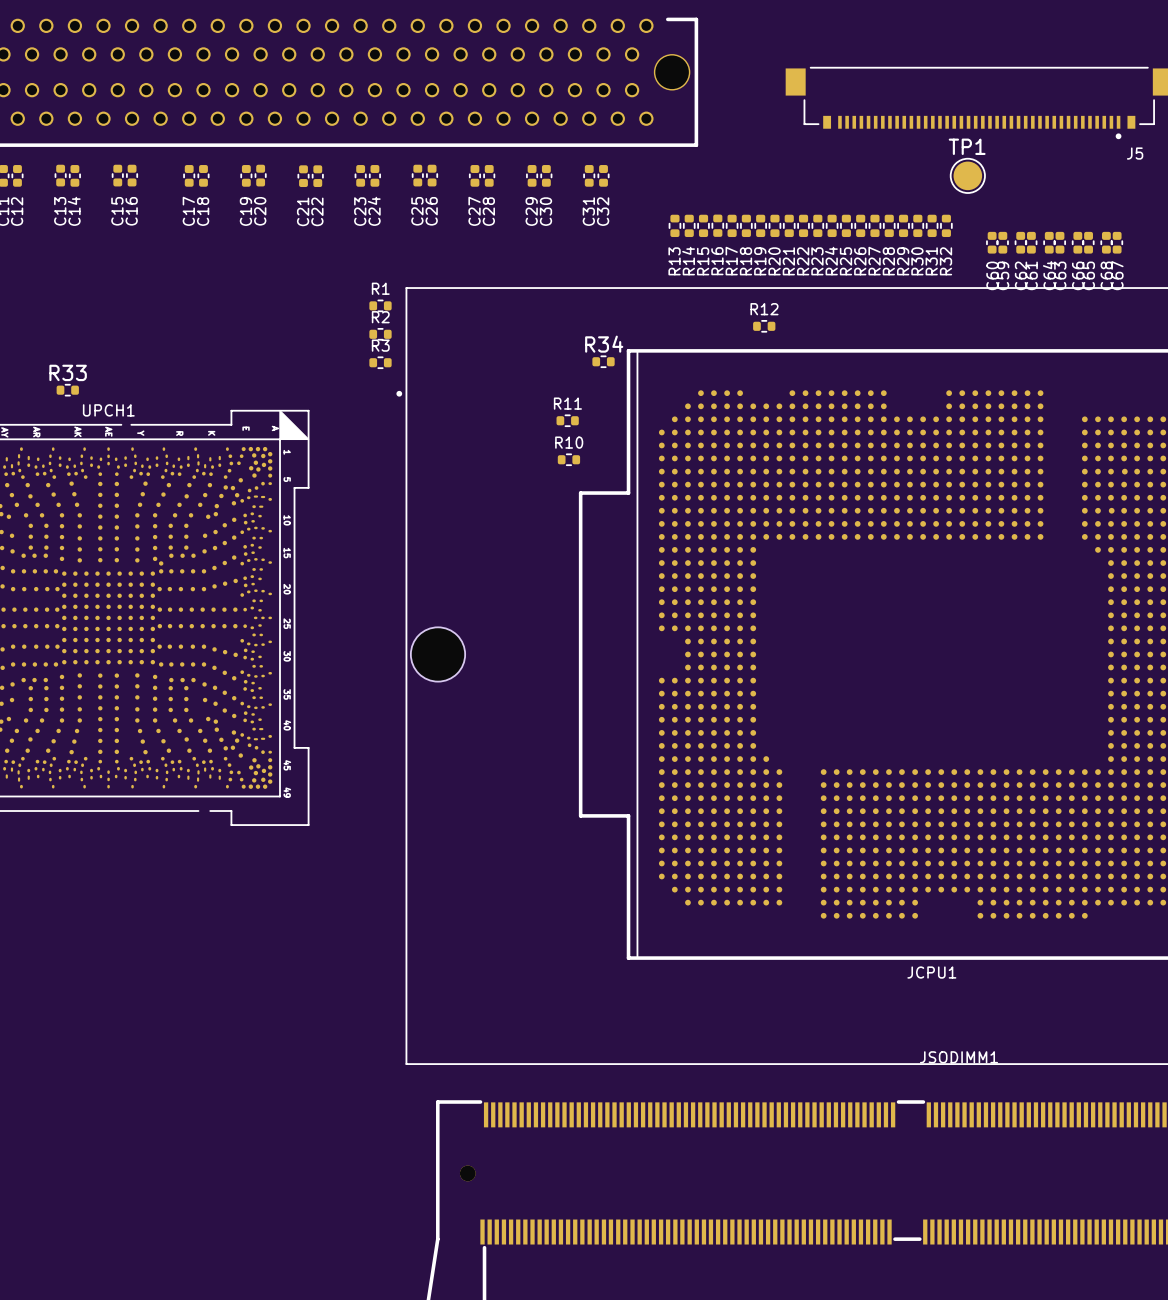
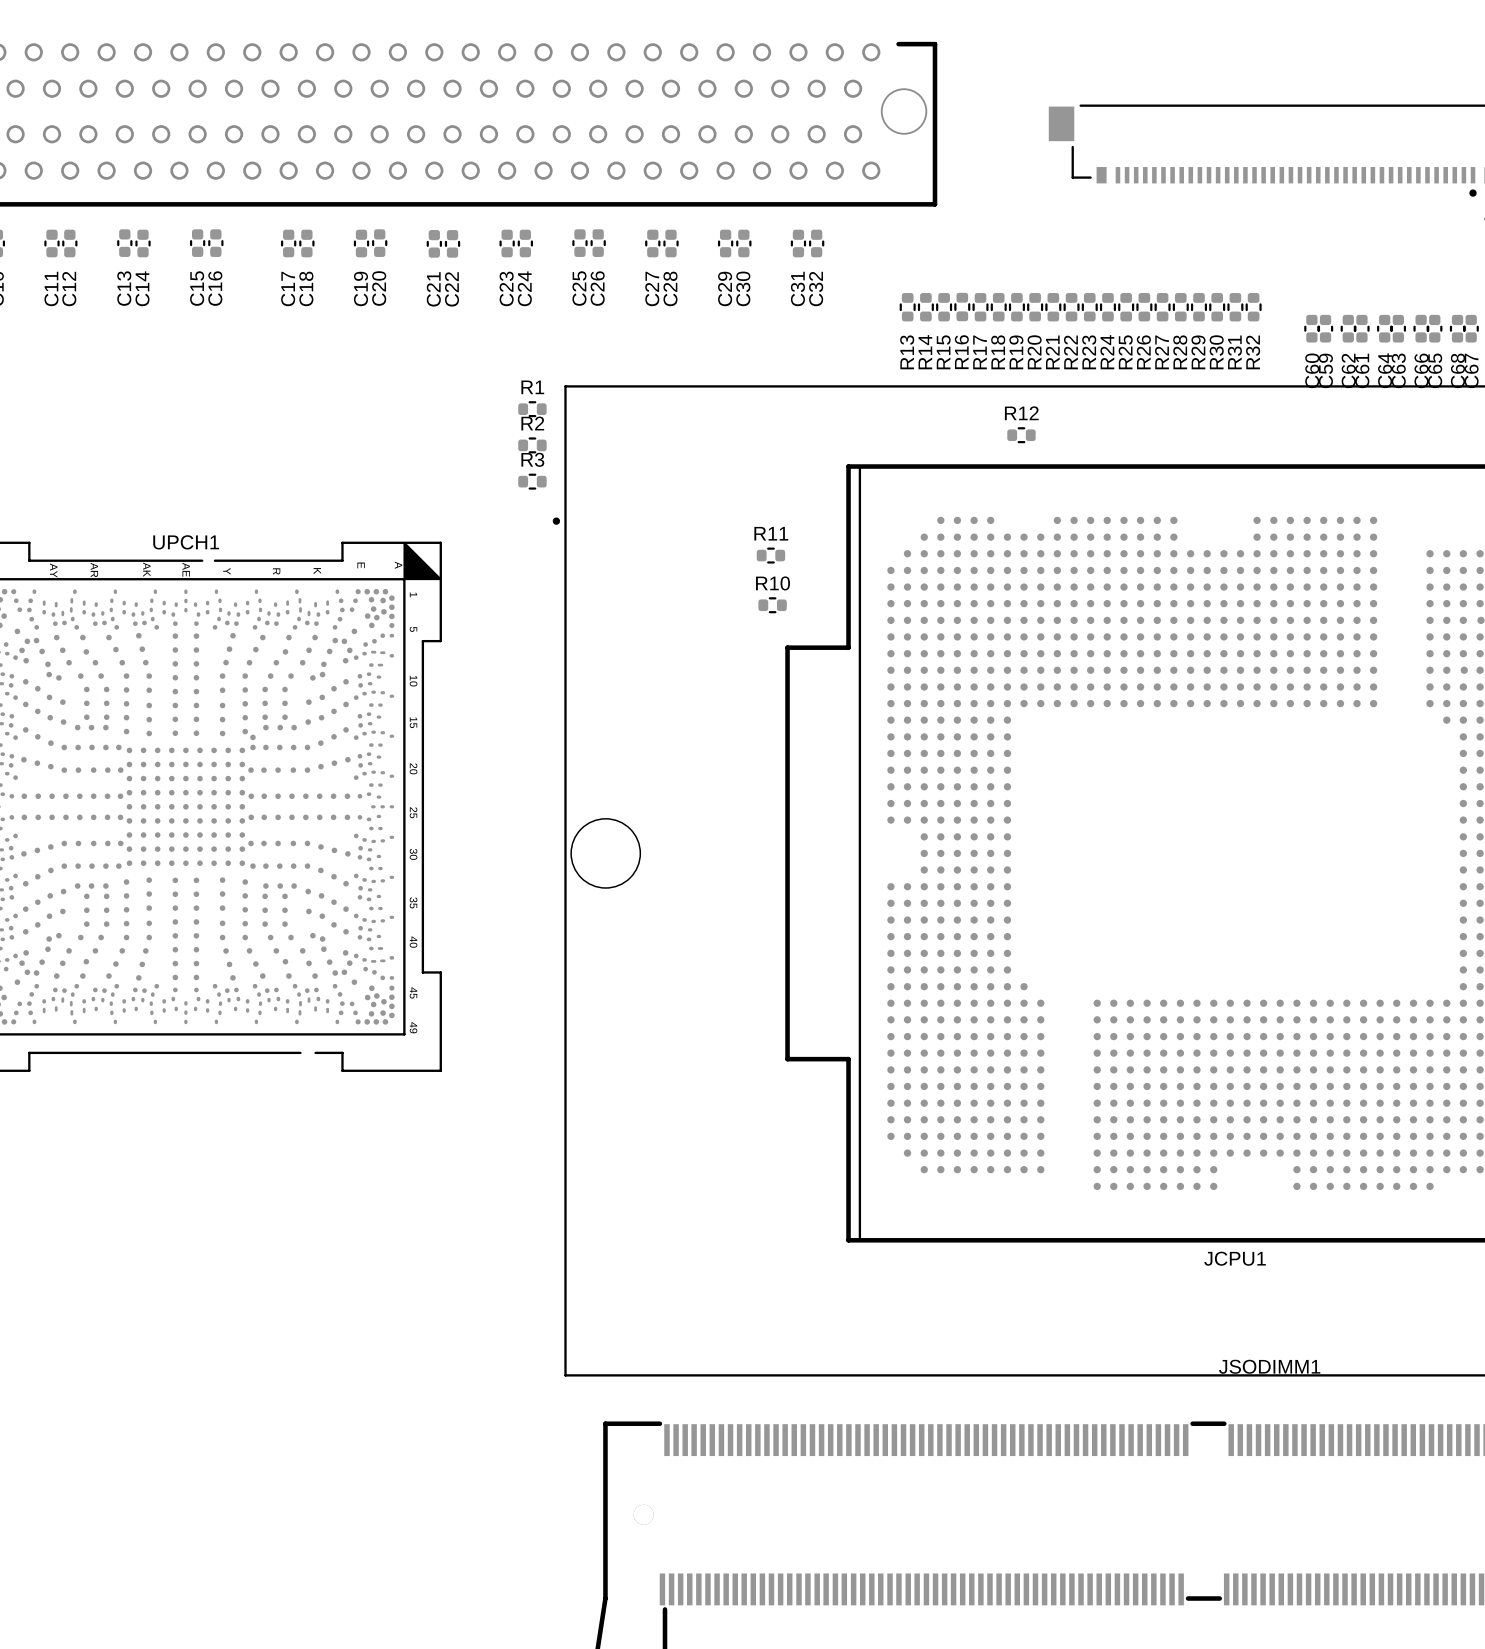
TP1: (967, 175) -> none
R34: (603, 361) -> none
R33: (67, 390) -> none

